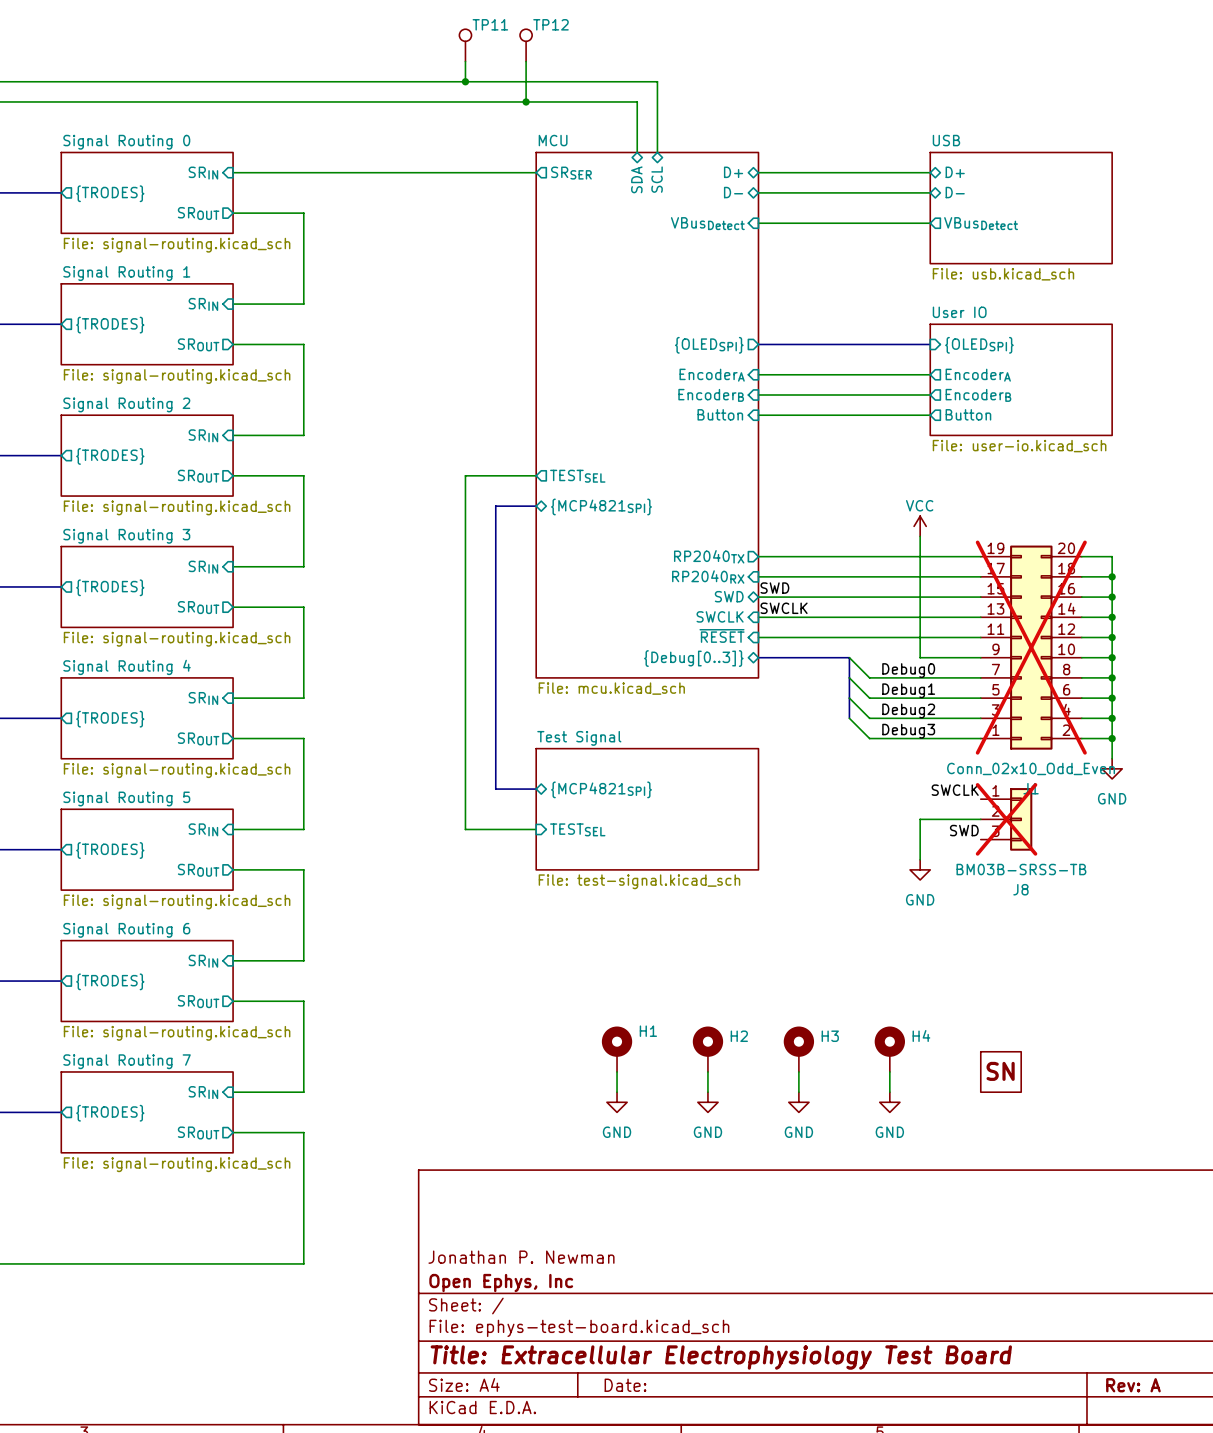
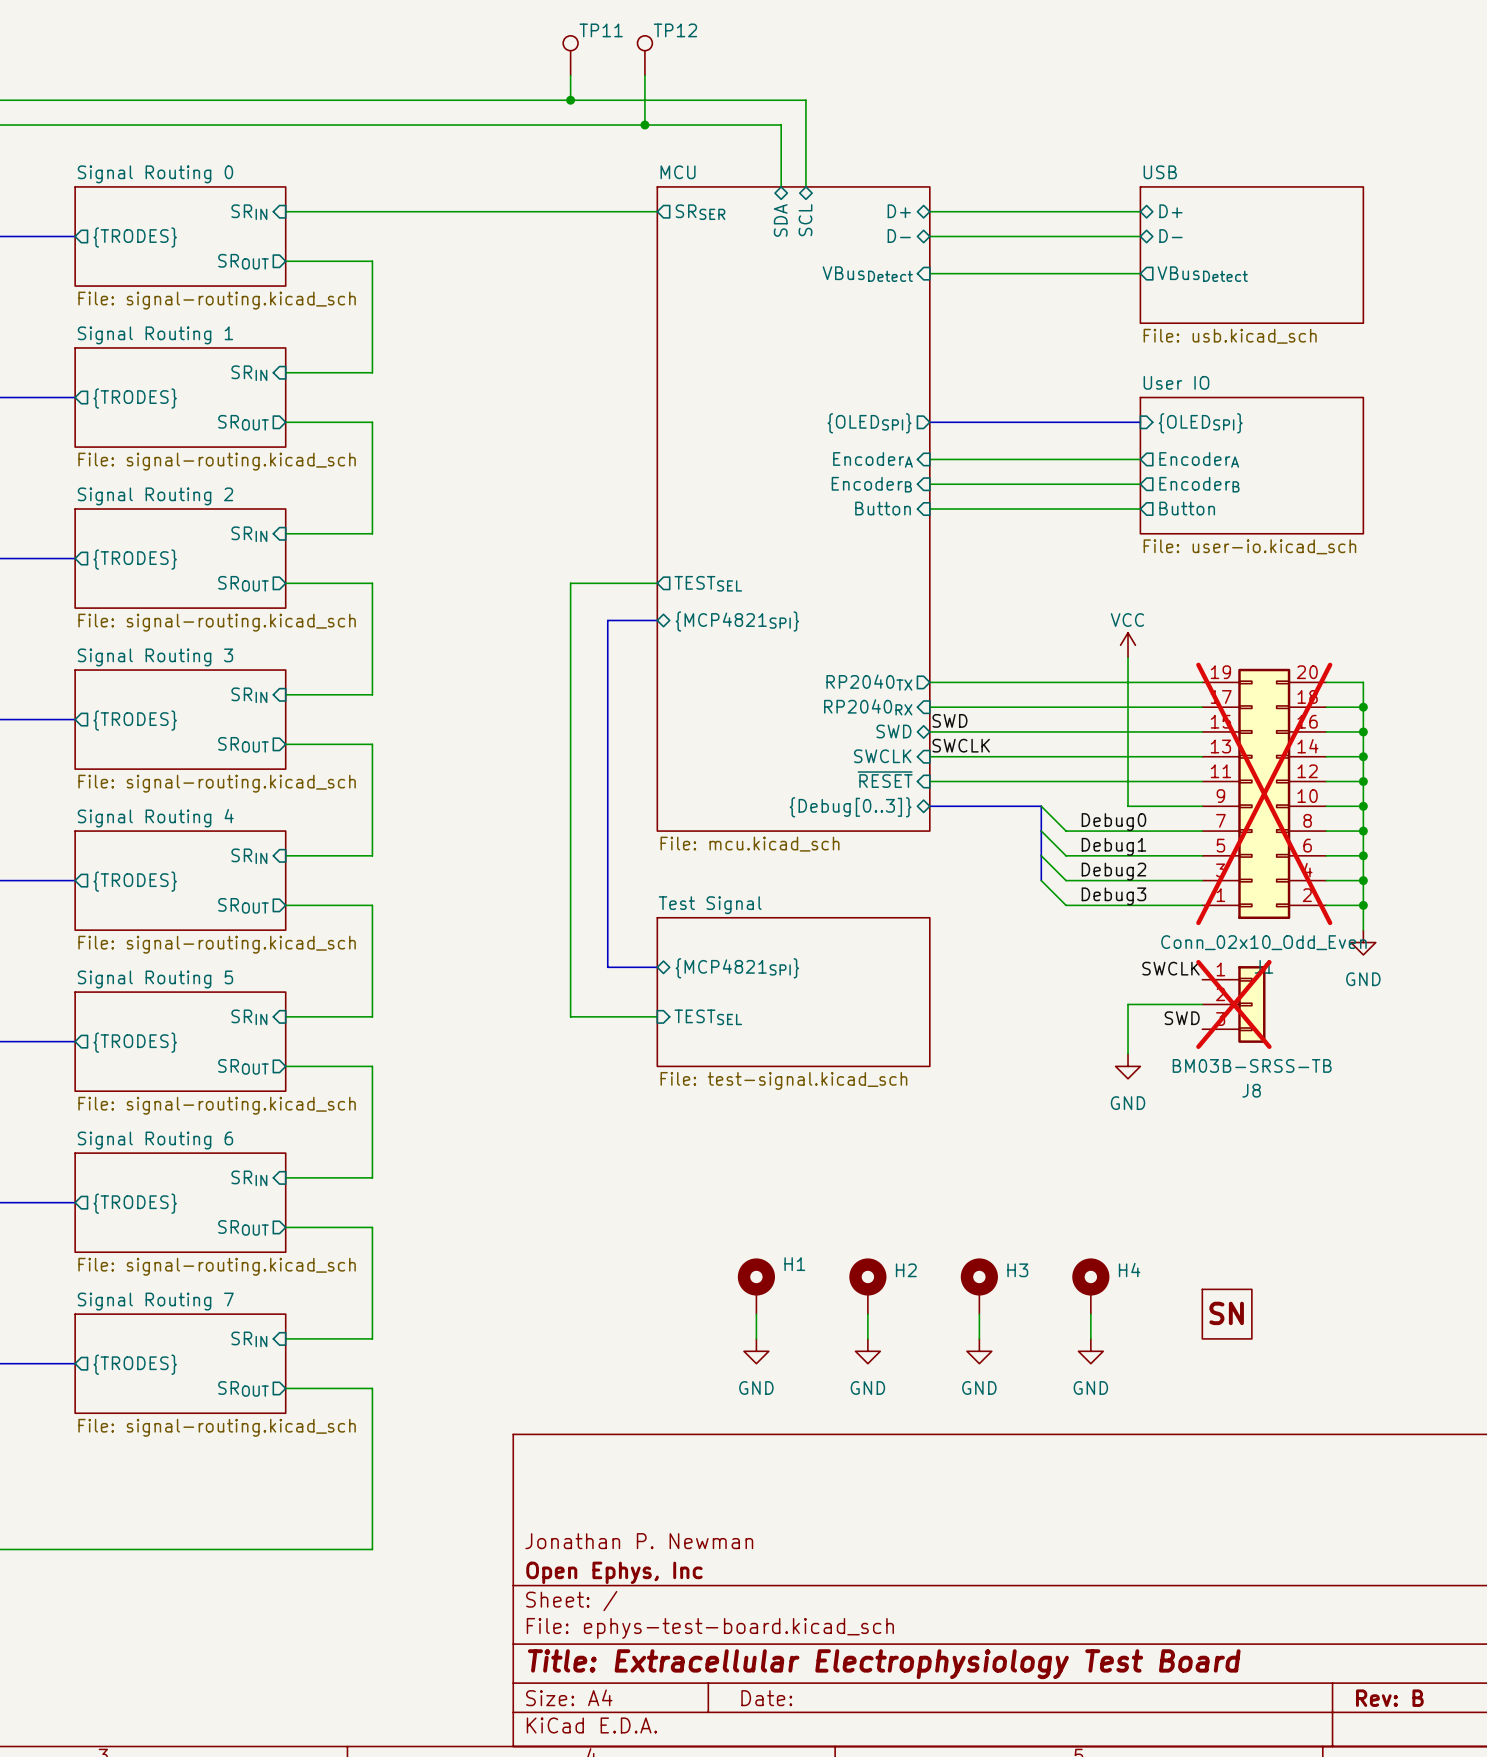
title block: Rev: A (1133, 1385) -> Rev: B (1389, 1698)

